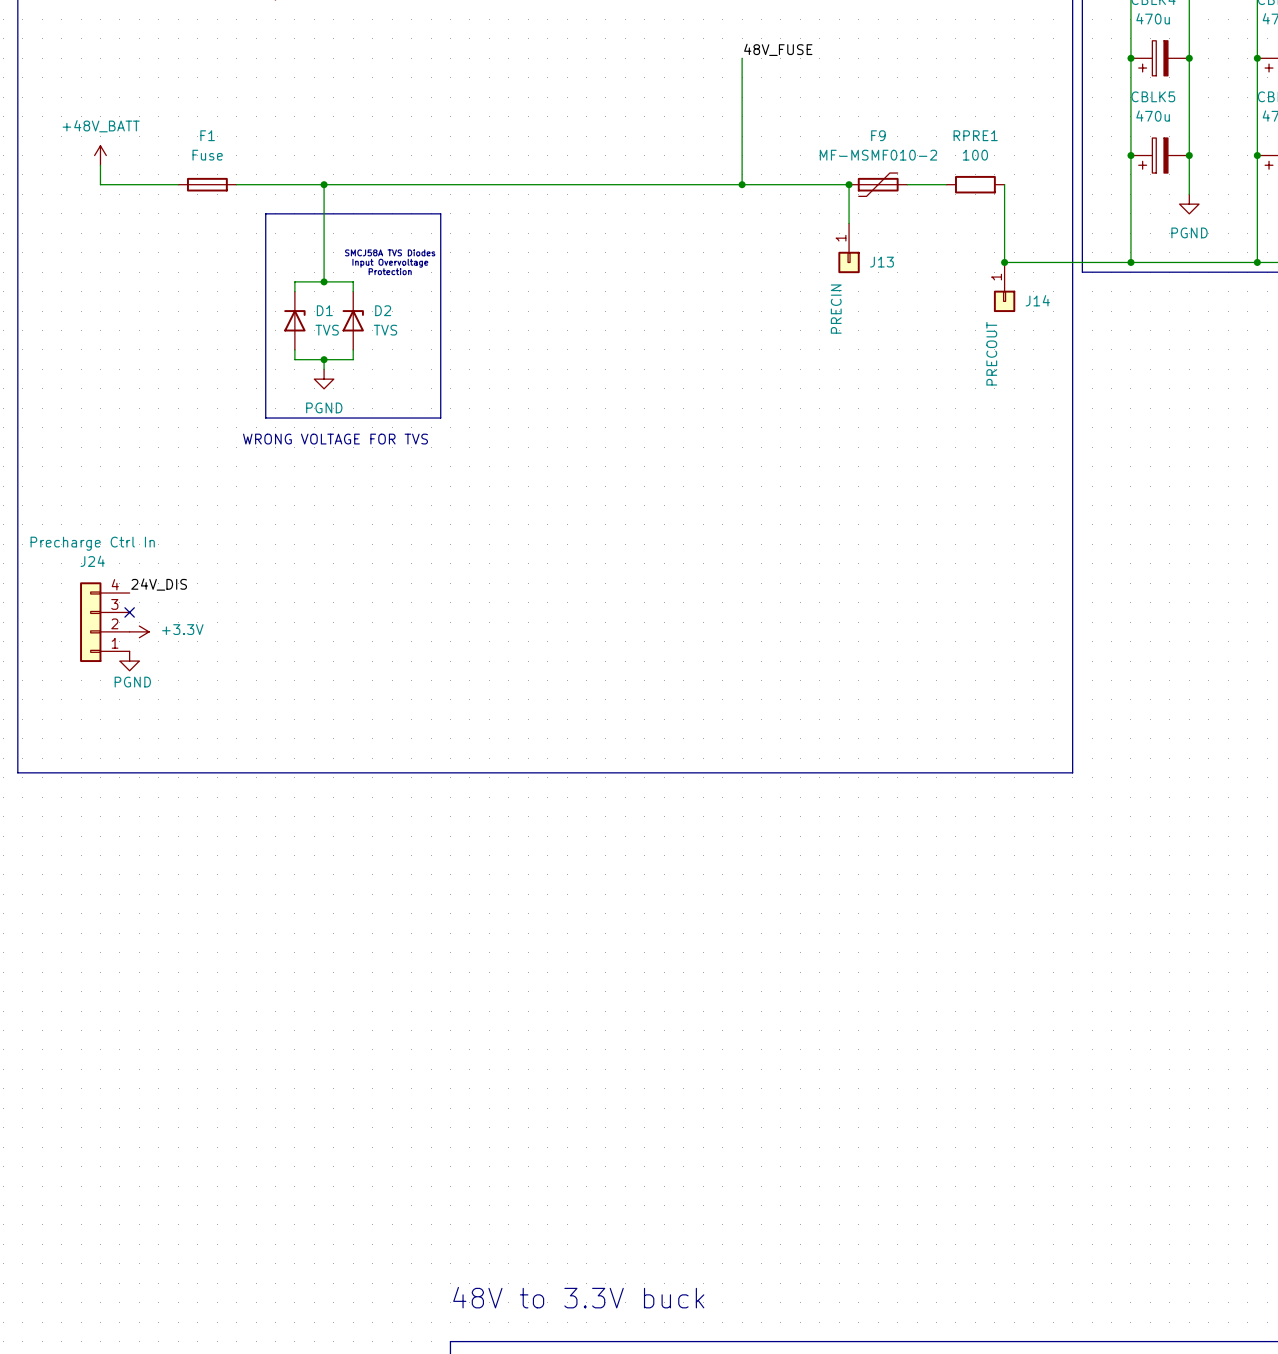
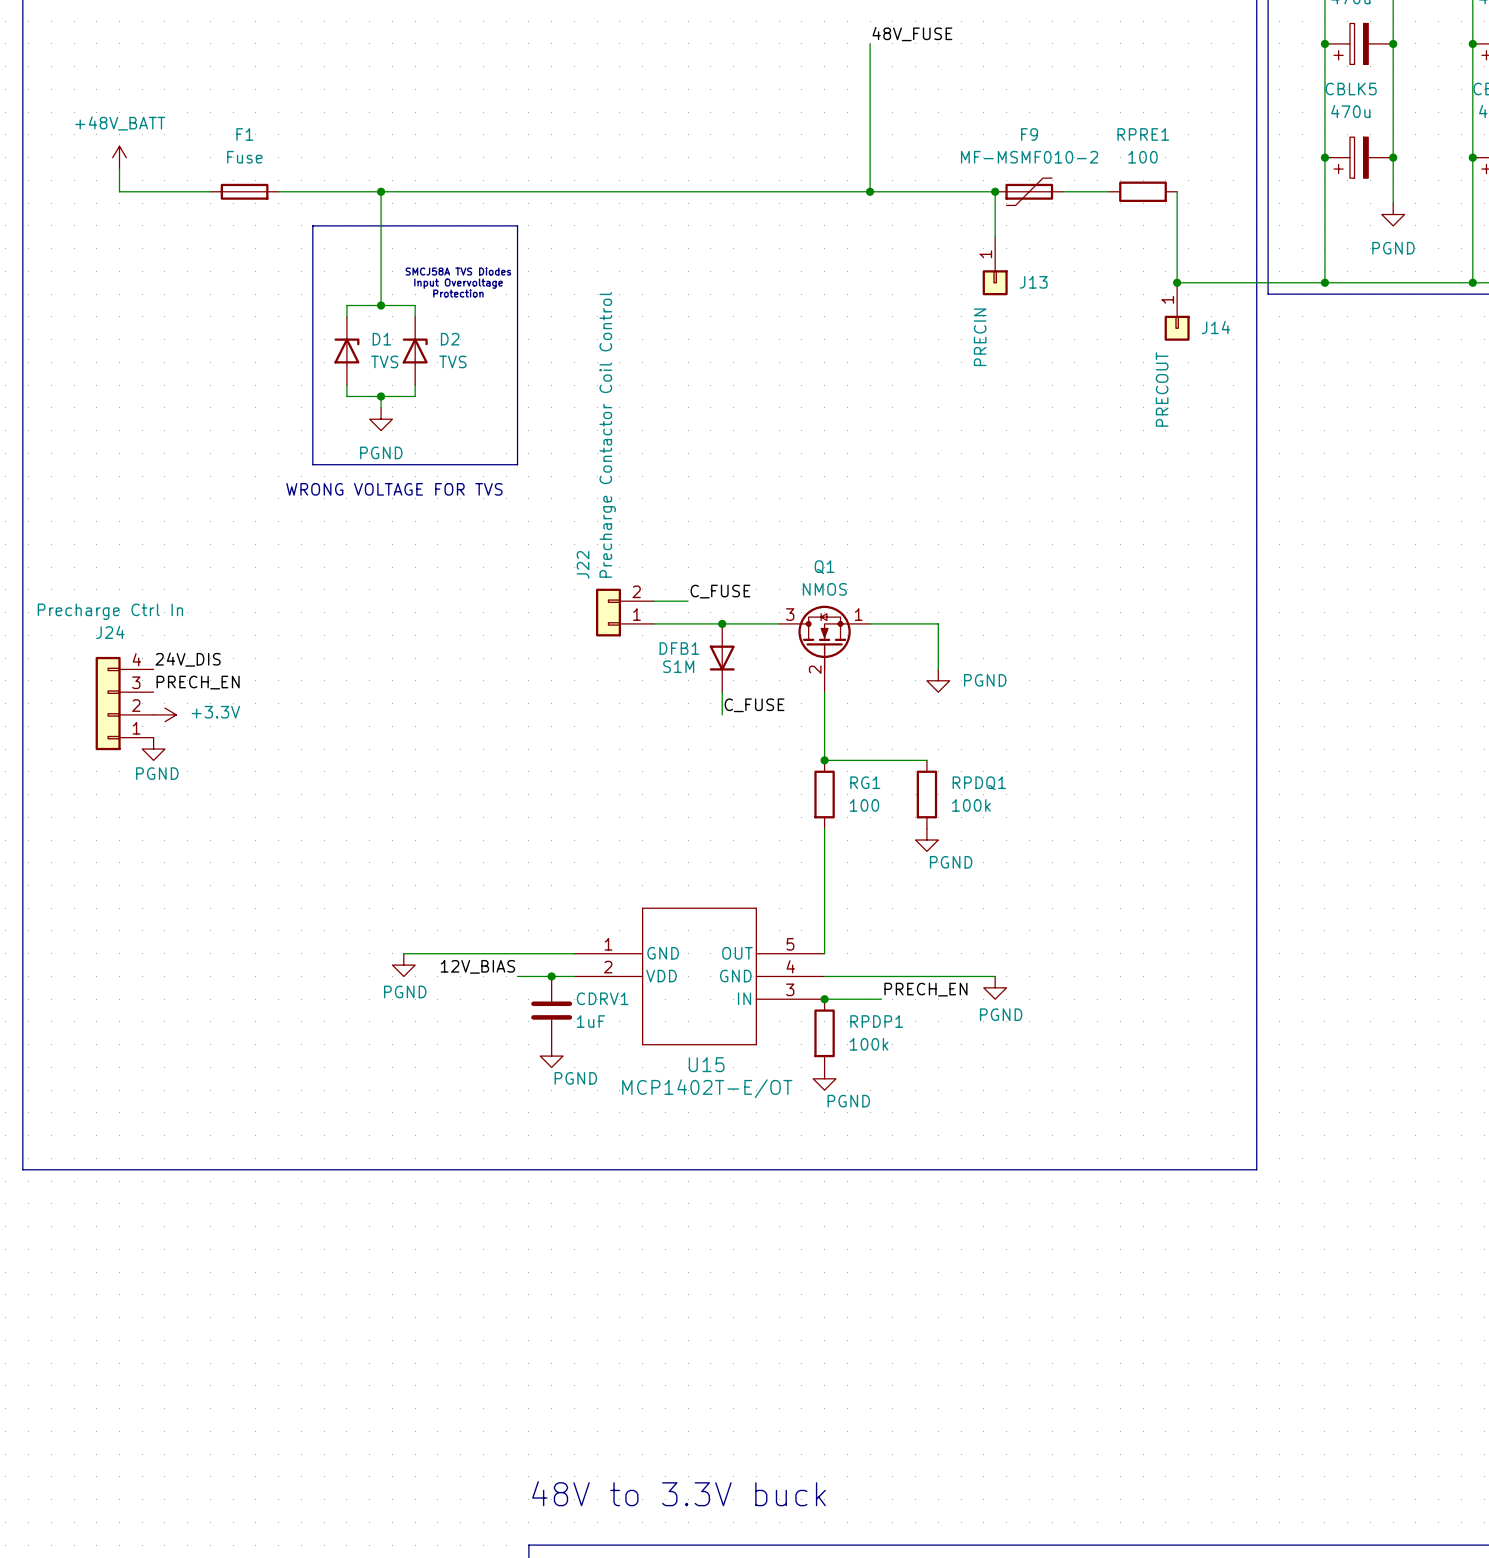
label: none -> C_FUSE (720, 591)
wire: none -> (654, 601) (688, 601)
J22: none -> Precharge Contactor Coil Control (625, 612)
wire: none -> (654, 623) (779, 623)
junction: none -> (722, 623)
wire: none -> (870, 623) (938, 623) (938, 669)
Q1: none -> NMOS (824, 648)
DFB1: none -> S1M (722, 658)
power symbol: none -> PGND (938, 680)
label: none -> PRECH_EN (198, 682)
no-connect mark: (129, 612) -> none
wire: none -> (722, 692) (722, 714)
wire: none -> (824, 692) (824, 760) (926, 760)
label: none -> C_FUSE (754, 705)
junction: none -> (824, 760)
RG1: none -> 100 (824, 794)
RPDQ1: none -> 100k (926, 794)
wire: none -> (824, 828) (824, 953)
power symbol: none -> PGND (926, 840)
line: (17, 772) (1072, 772) -> (22, 879) (22, 1169) (1256, 1169) (1256, 879)
wire: none -> (403, 953) (574, 953)
power symbol: none -> PGND (403, 965)
label: none -> 12V_BIAS (477, 966)
wire: none -> (517, 976) (574, 976)
junction: none -> (551, 976)
U15: none -> MCP1402T-E/OT (699, 976)
wire: none -> (824, 976) (995, 976)
power symbol: none -> PGND (995, 987)
label: none -> PRECH_EN (925, 989)
wire: none -> (824, 999) (881, 999)
junction: none -> (824, 999)
CDRV1: none -> 1uF (551, 1010)
RPDP1: none -> 100k (824, 1033)
power symbol: none -> PGND (551, 1056)
power symbol: none -> PGND (824, 1078)

